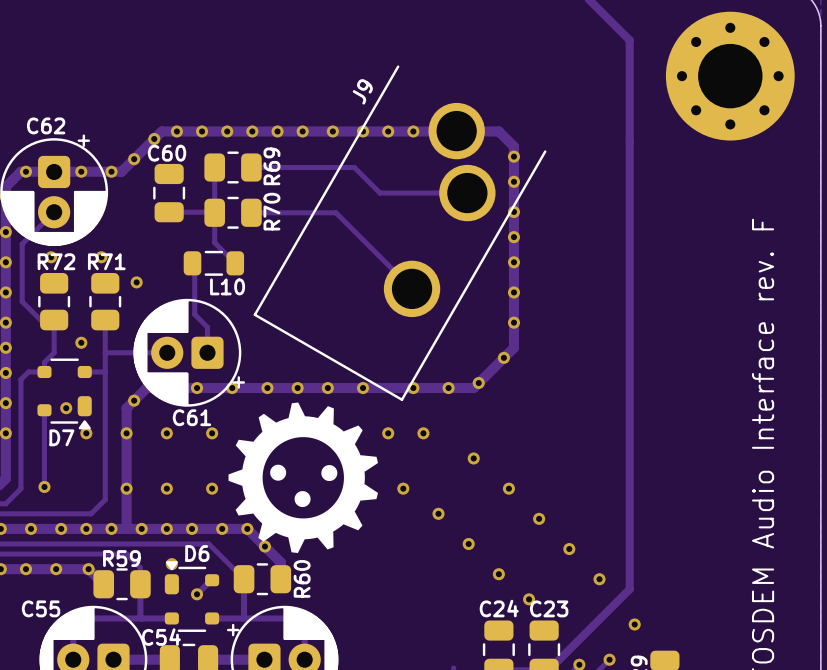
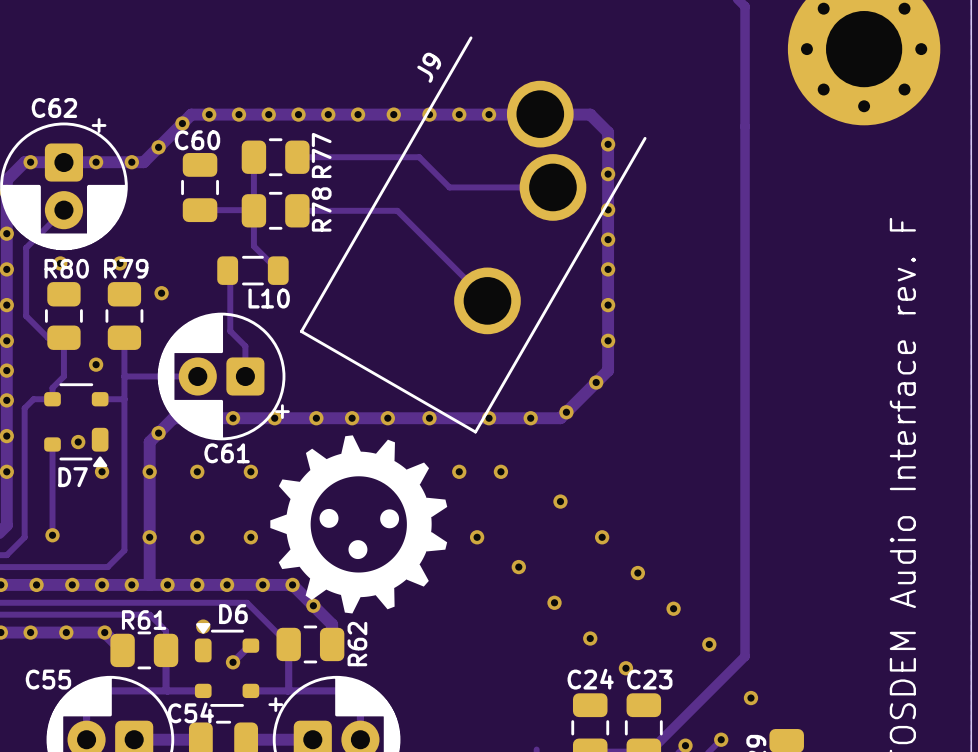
R69 name: R69 (271, 166) -> R77 (321, 155)
R70 name: R70 (271, 211) -> R78 (321, 209)
R72 name: R72 (56, 261) -> R80 (66, 268)
R71 name: R71 (106, 261) -> R79 (126, 268)
R59 name: R59 (121, 558) -> R61 (144, 620)
R60 name: R60 (302, 578) -> R62 (357, 644)

